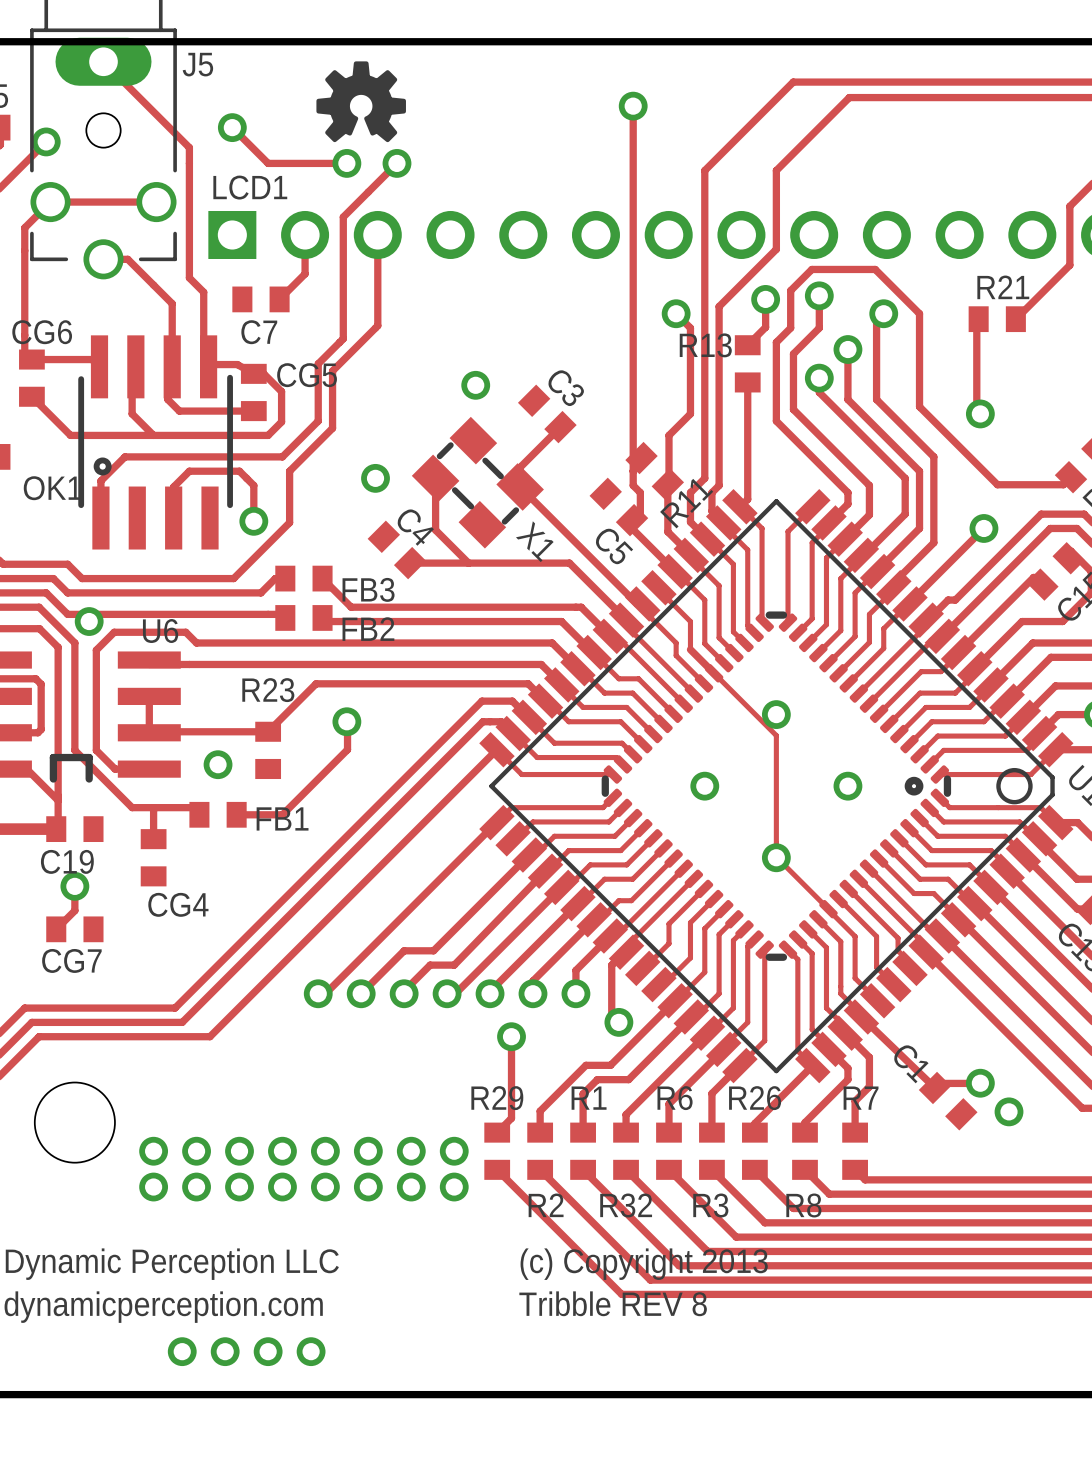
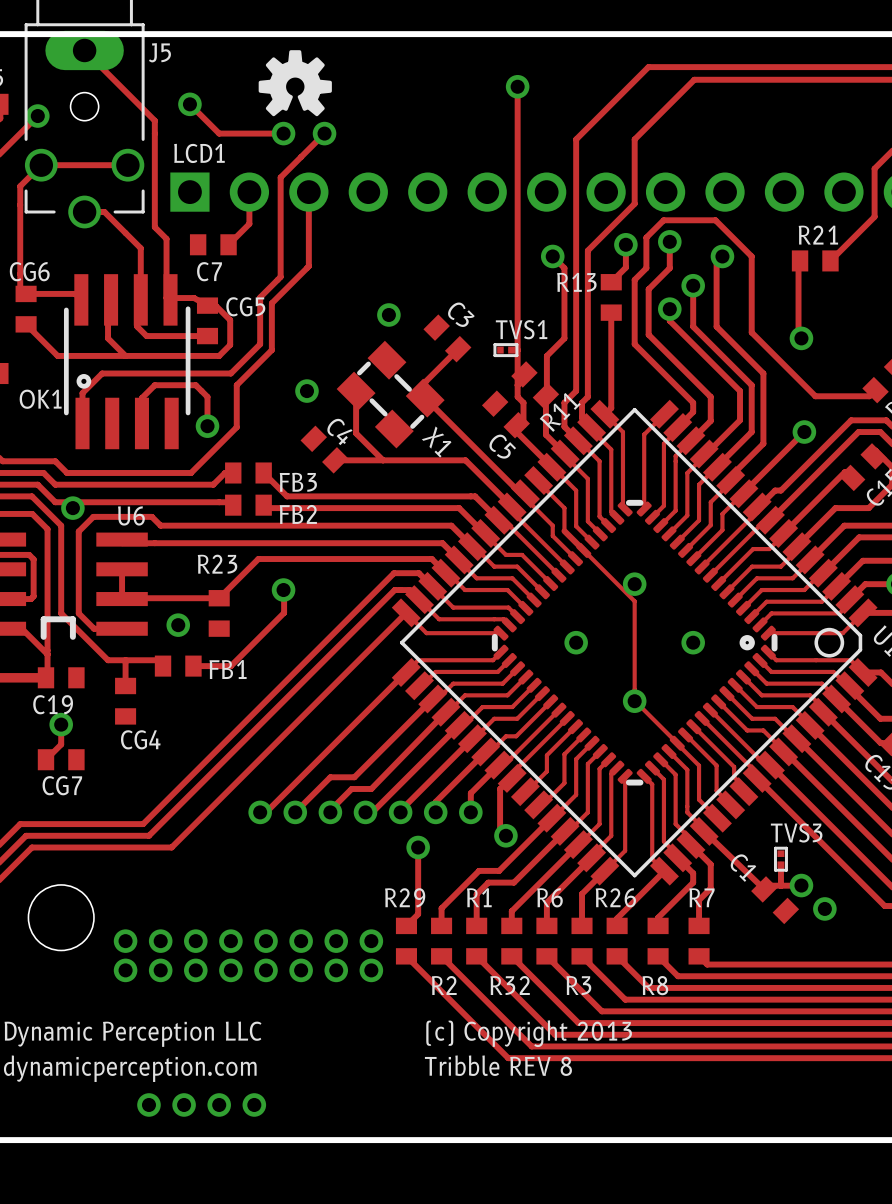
TVS1: none -> (505, 350)
TVS3: none -> (780, 859)
track: none -> (780, 864) (780, 885)

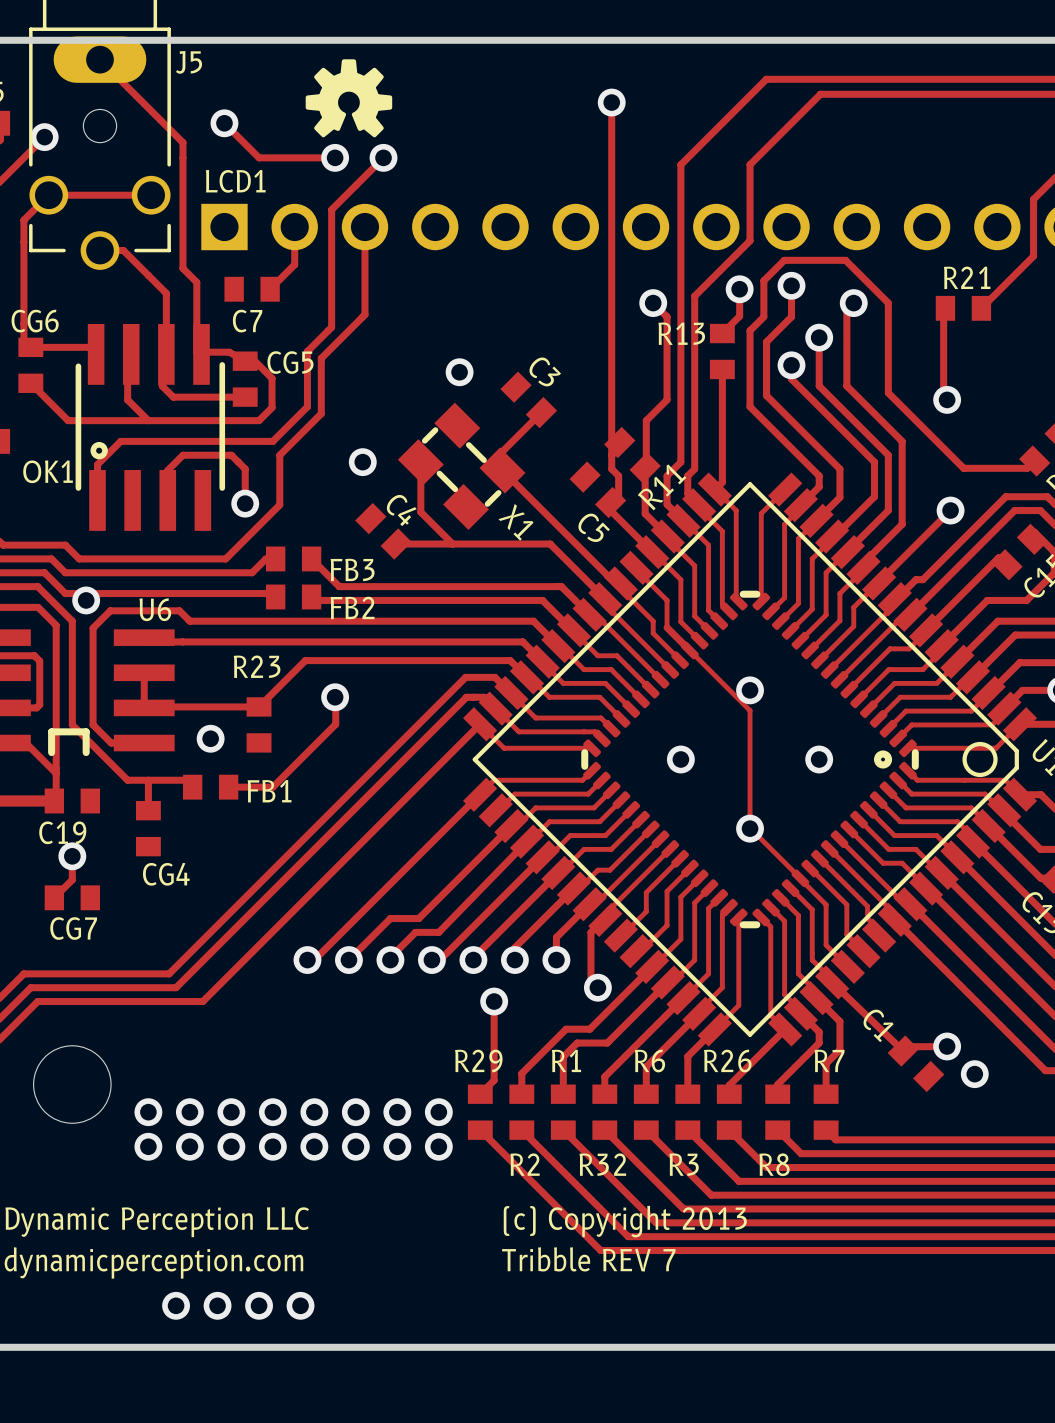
TVS1: (505, 350) -> none
TVS3: (780, 859) -> none
track: (780, 864) (780, 885) -> none
text: Tribble REV 8 (498, 1065) -> Tribble REV 7 (588, 1259)

